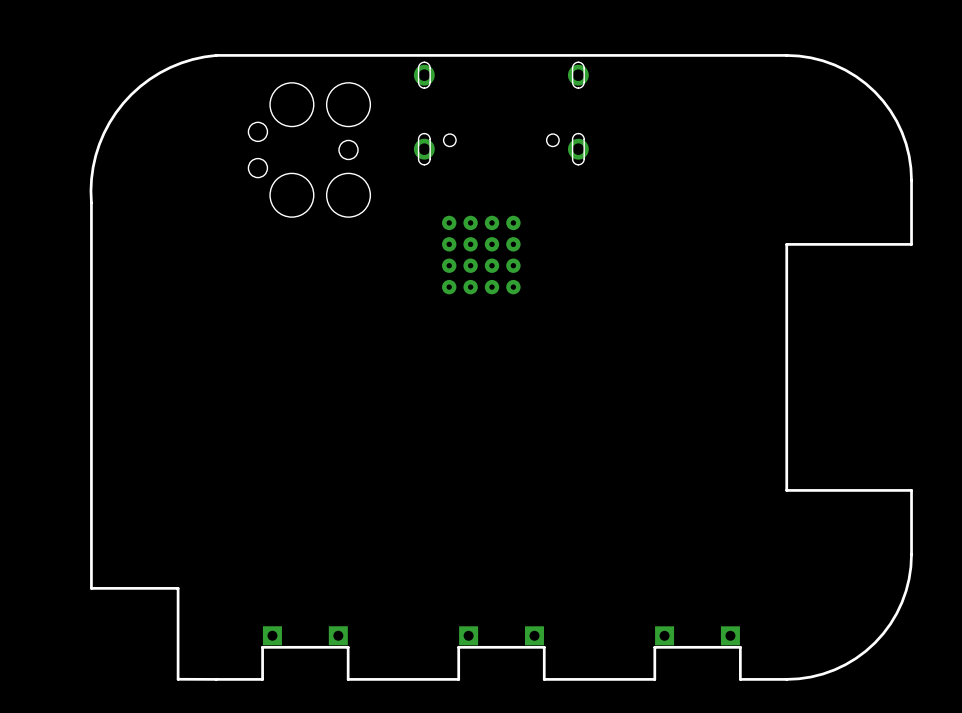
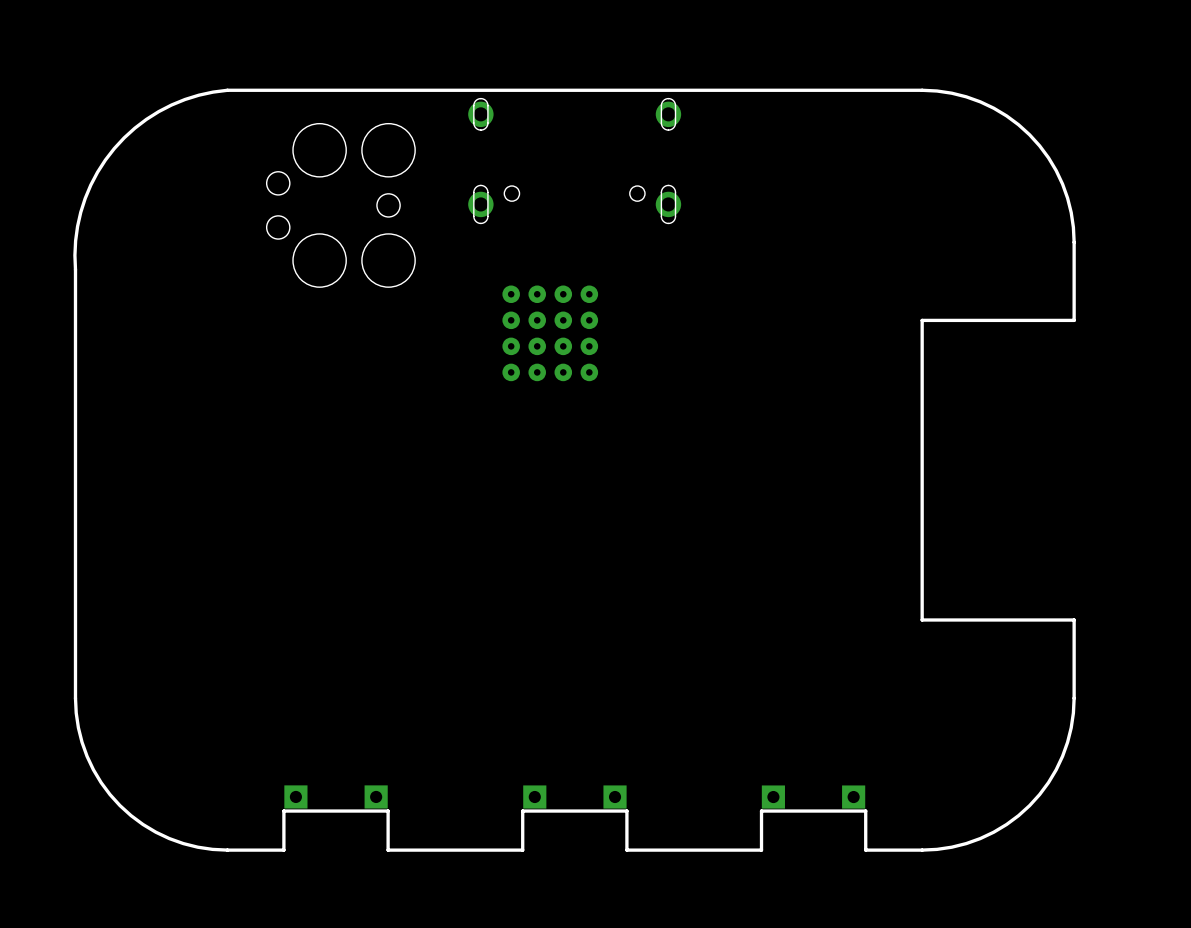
board edge: (91, 554) (91, 588) (178, 588) (178, 679) (216, 679) -> (75, 698) (78, 727) (87, 756) (101, 782) (120, 805) (143, 824) (169, 838) (197, 847) (227, 850)

